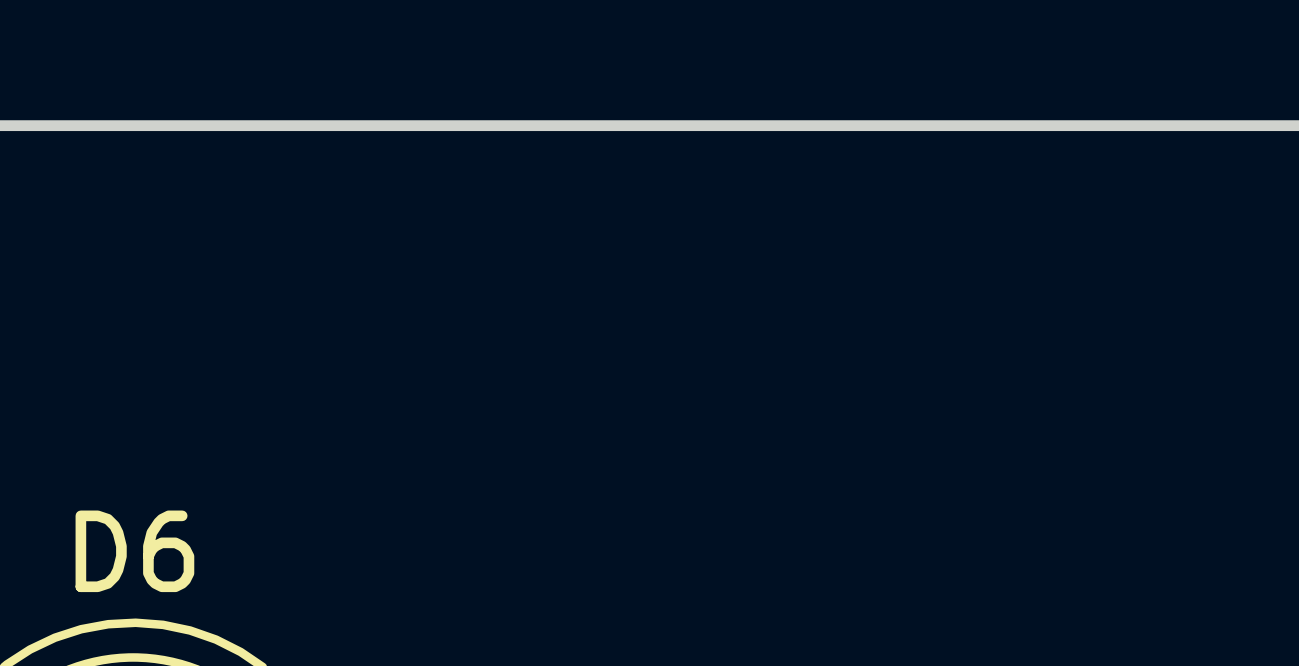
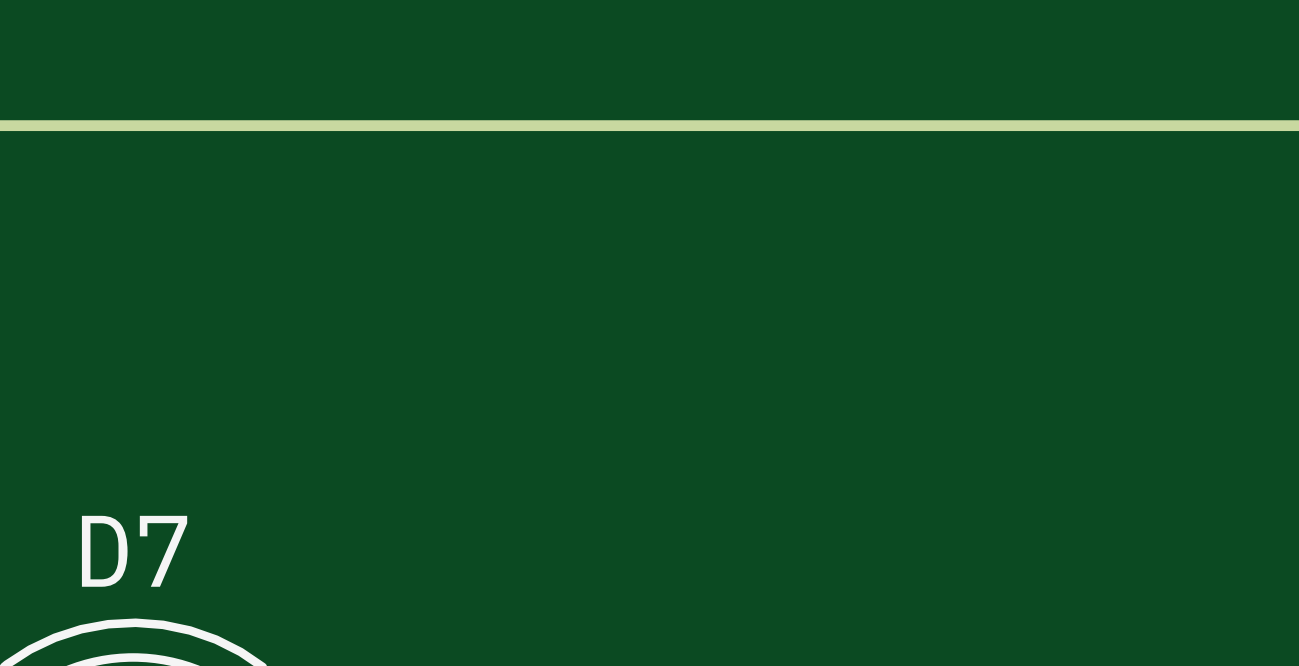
D6 name: D6 (134, 551) -> D7 (134, 551)

